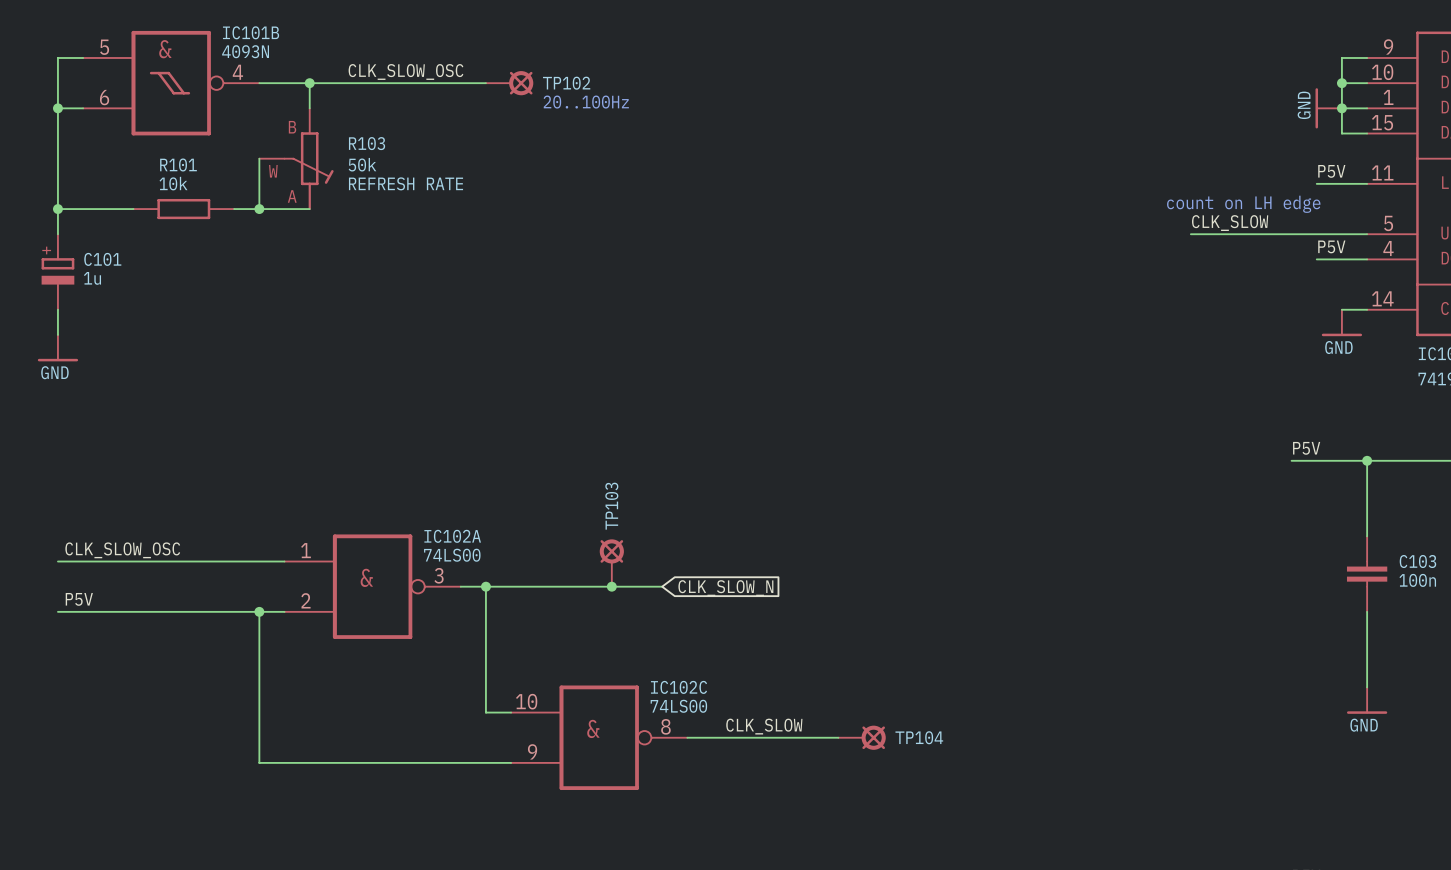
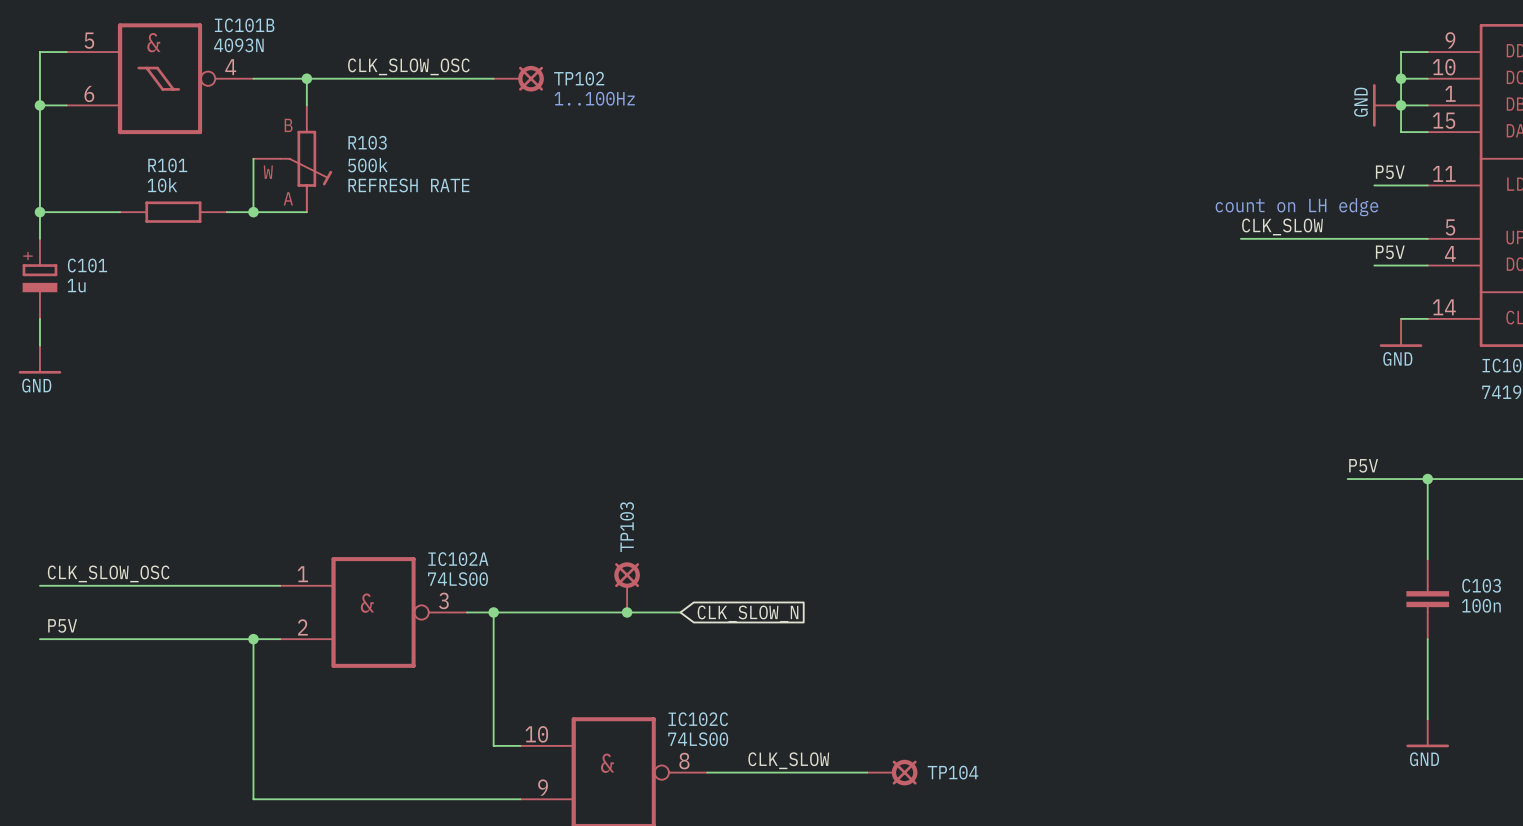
text: 20..100Hz (586, 102) -> 1..100Hz (594, 98)
R103 value: 50k (362, 164) -> 500k (367, 165)

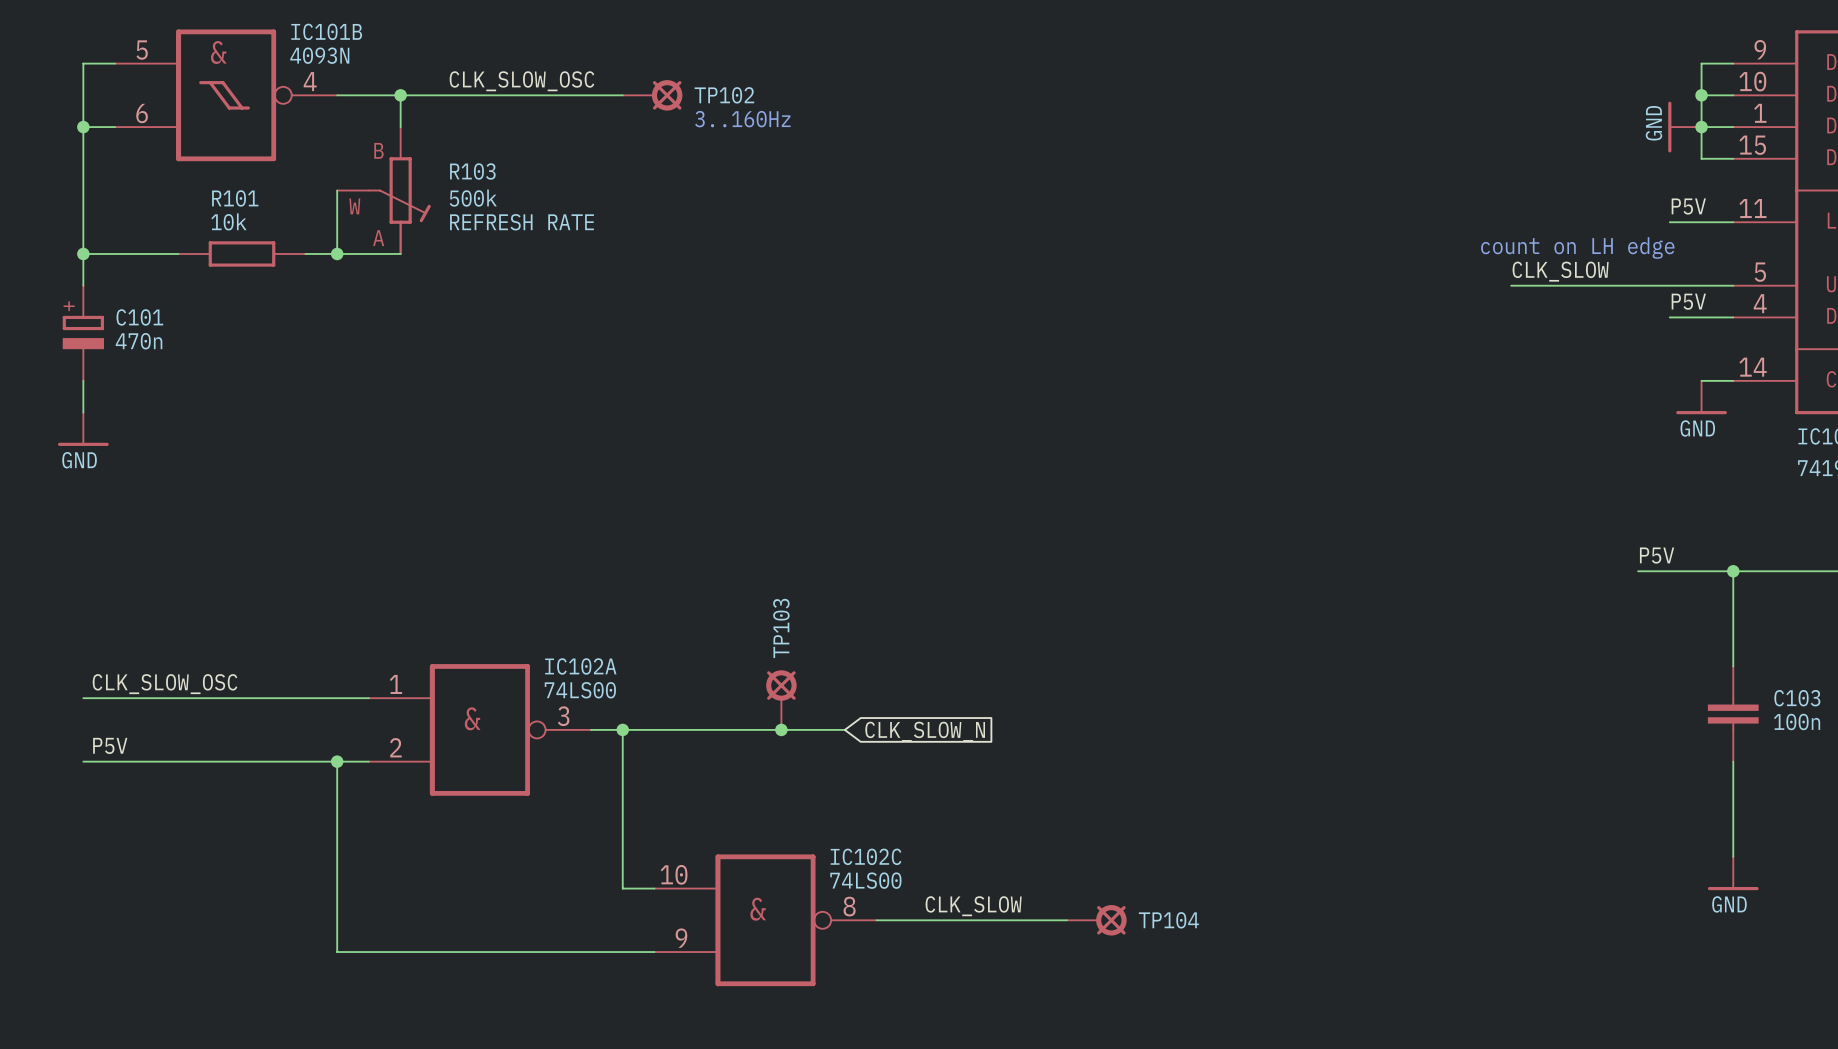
text: 1..100Hz (594, 98) -> 3..160Hz (742, 119)
C101 value: 1u (76, 285) -> 470n (139, 341)

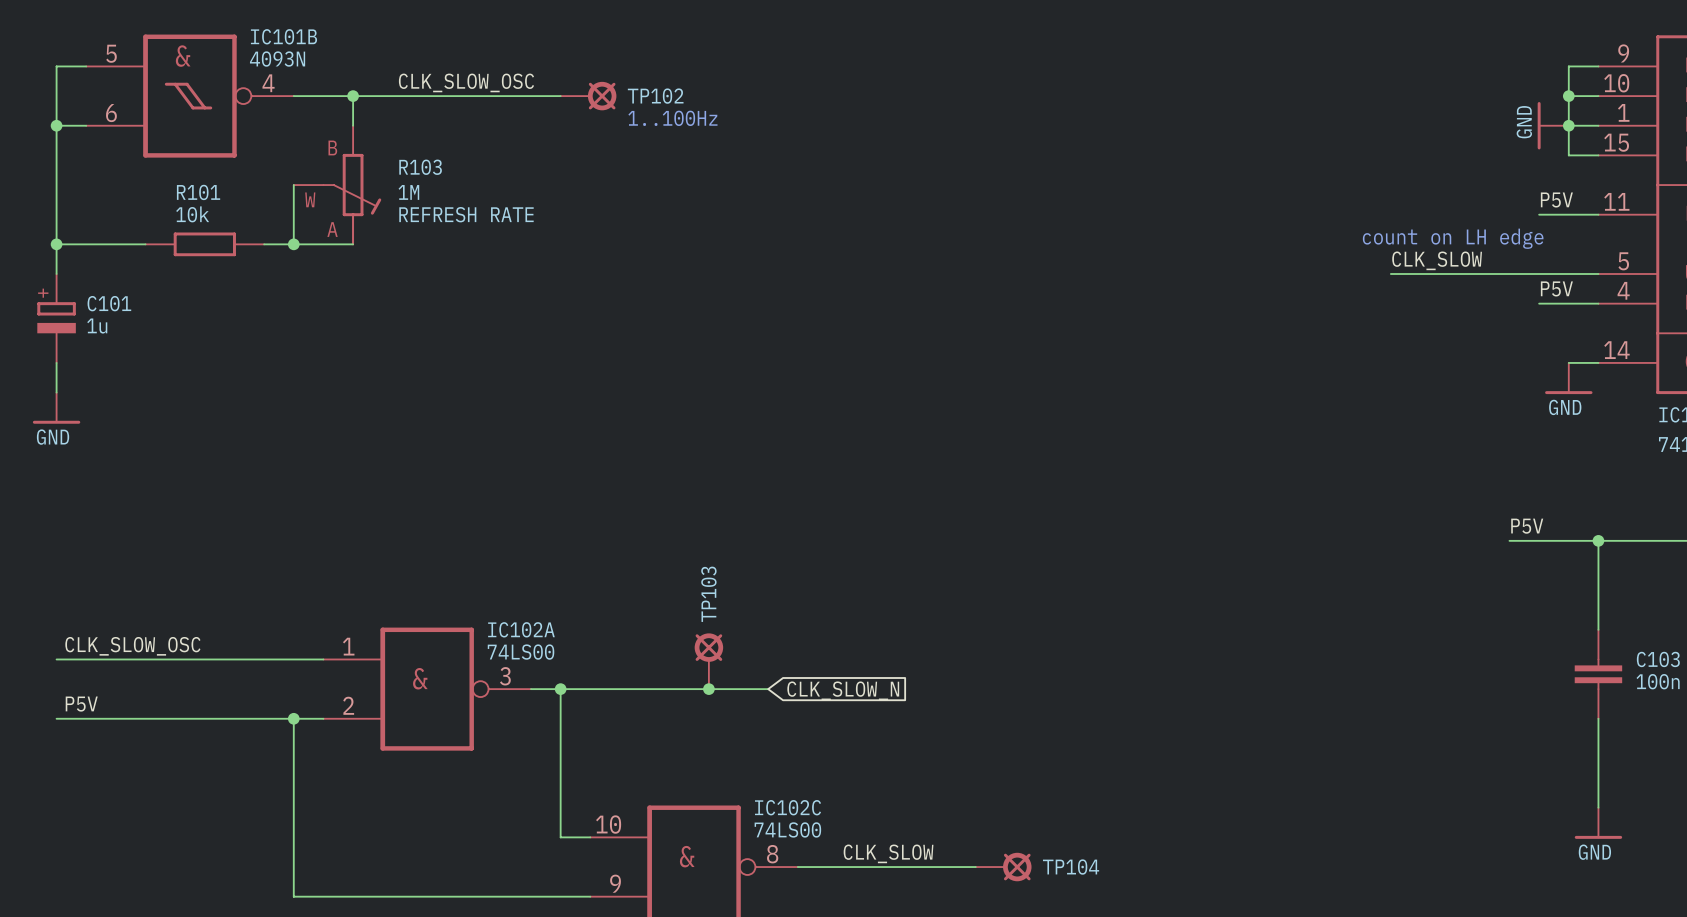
text: 3..160Hz (742, 119) -> 1..100Hz (672, 118)
R103 value: 500k (473, 198) -> 1M (408, 192)
C101 value: 470n (139, 341) -> 1u (97, 326)

